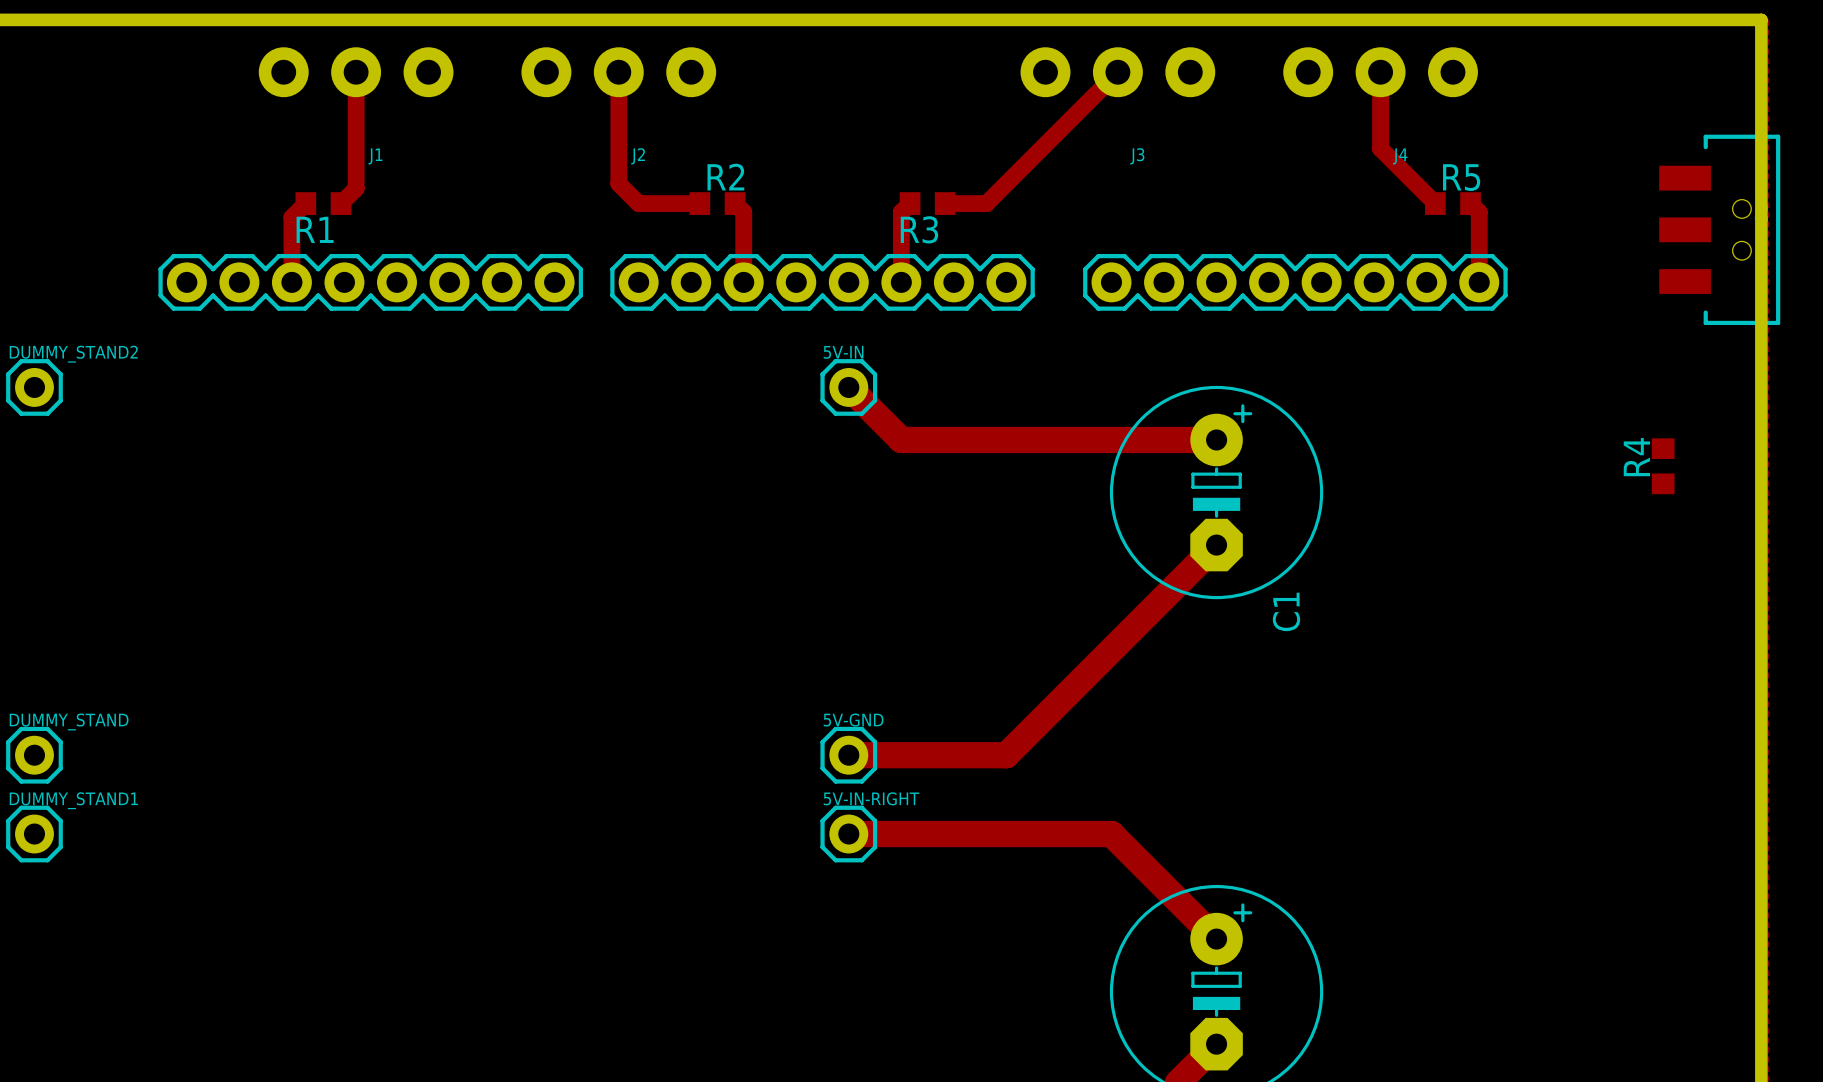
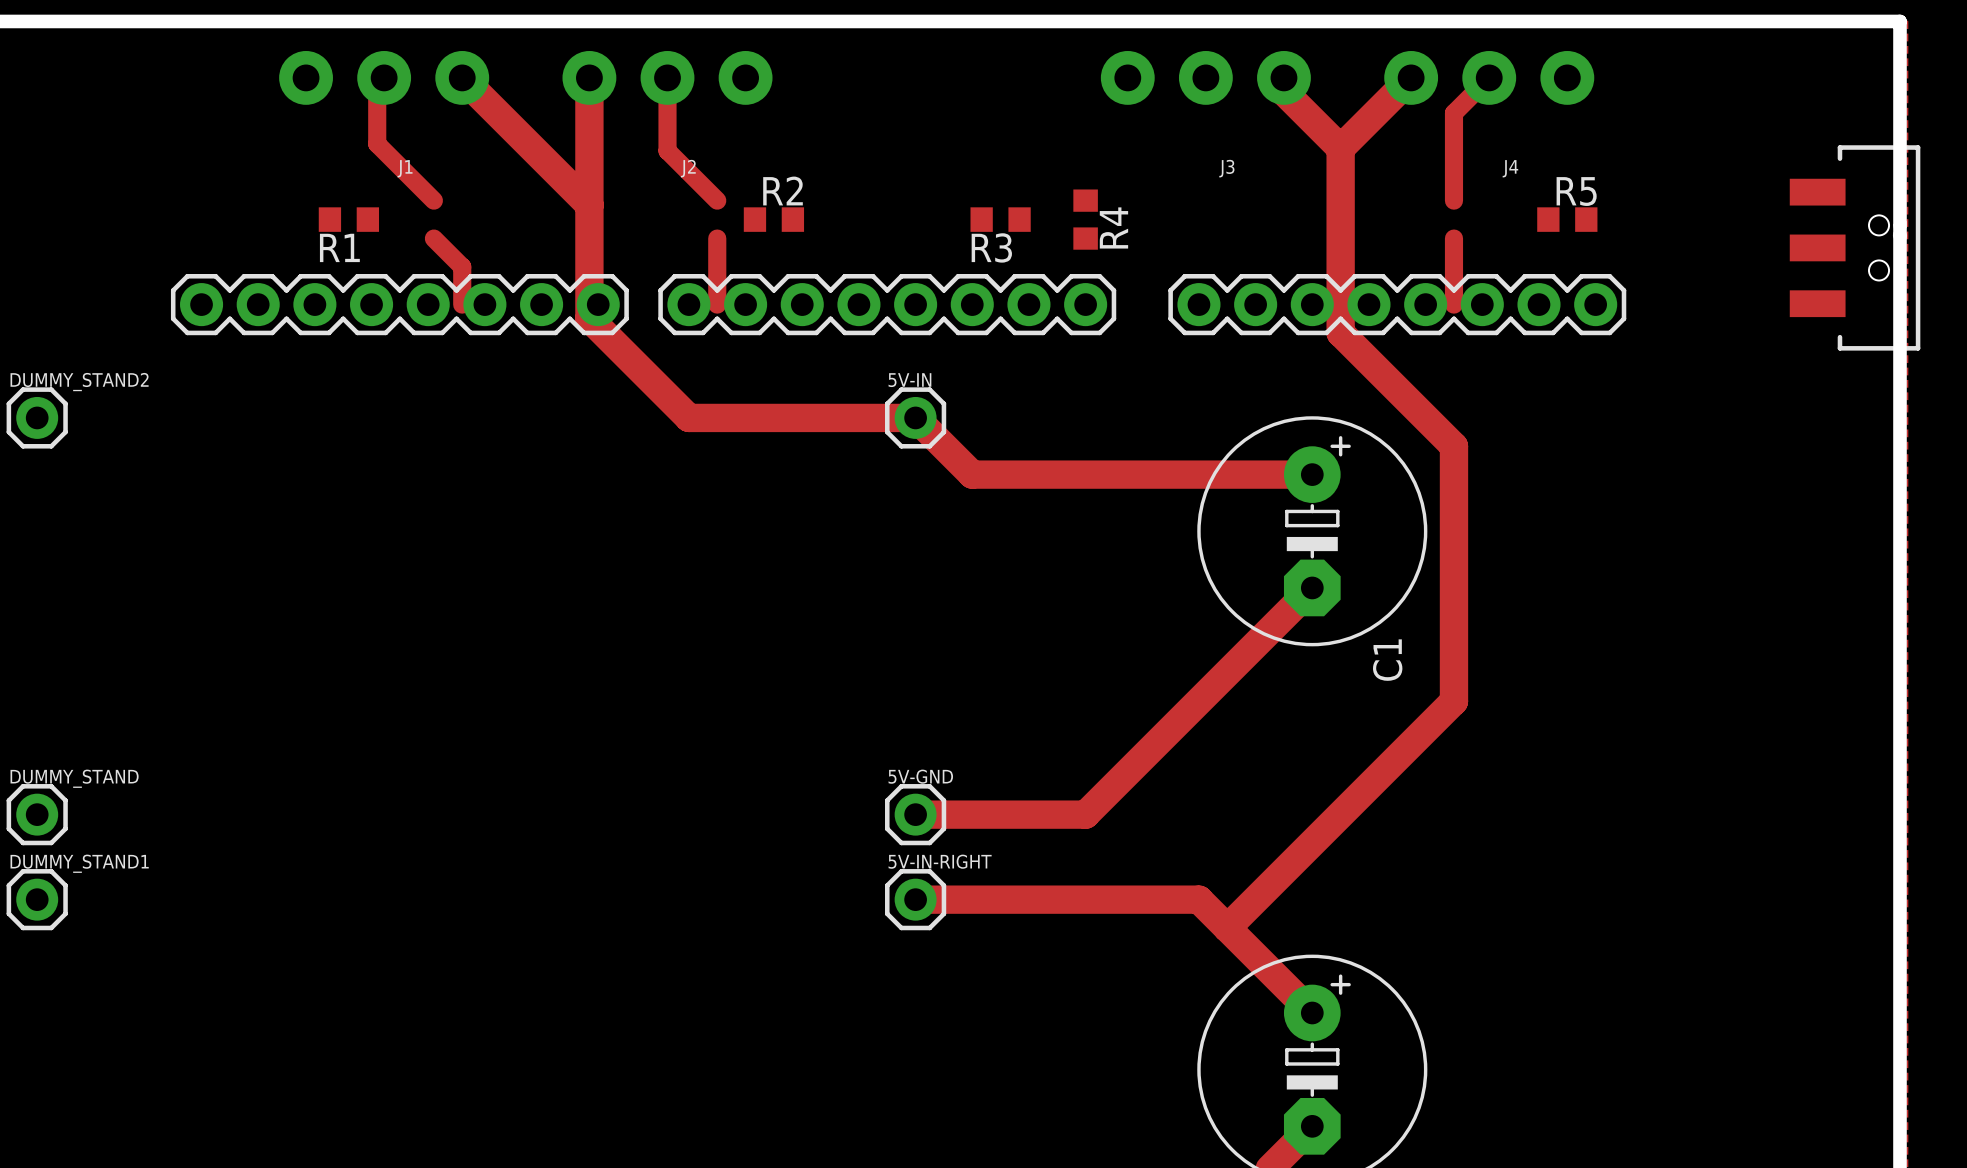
top track: (356, 72) (356, 188) (341, 203) -> (384, 77) (377, 84) (377, 143) (433, 200)
top track: none -> (462, 77) (589, 205)
top track: none -> (589, 77) (589, 318) (688, 417) (915, 417)
top track: (1117, 72) (986, 203) (945, 203) -> none
top track: none -> (1283, 77) (1283, 91) (1340, 148)
top track: none -> (1411, 77) (1340, 148)
top track: (1380, 72) (1380, 148) (1435, 203) -> (1489, 77) (1453, 113) (1453, 200)
top track: none -> (1340, 148) (1340, 332) (1453, 446) (1453, 701) (1227, 927)
top track: (618, 139) (618, 183) (638, 203) (699, 203) -> (667, 150) (717, 200)
top track: (305, 203) (291, 217) (291, 282) -> none
top track: (735, 203) (743, 212) (743, 282) -> none
top track: (910, 203) (901, 212) (901, 282) -> none
top track: (1470, 203) (1479, 212) (1479, 282) -> none
top track: none -> (433, 238) (462, 266) (462, 304)
top track: none -> (717, 238) (717, 304)
top track: none -> (1453, 238) (1453, 304)
R4 name position: R4 (1636, 457) -> R4 (1113, 227)
R4 position: (1663, 466) -> (1085, 219)

